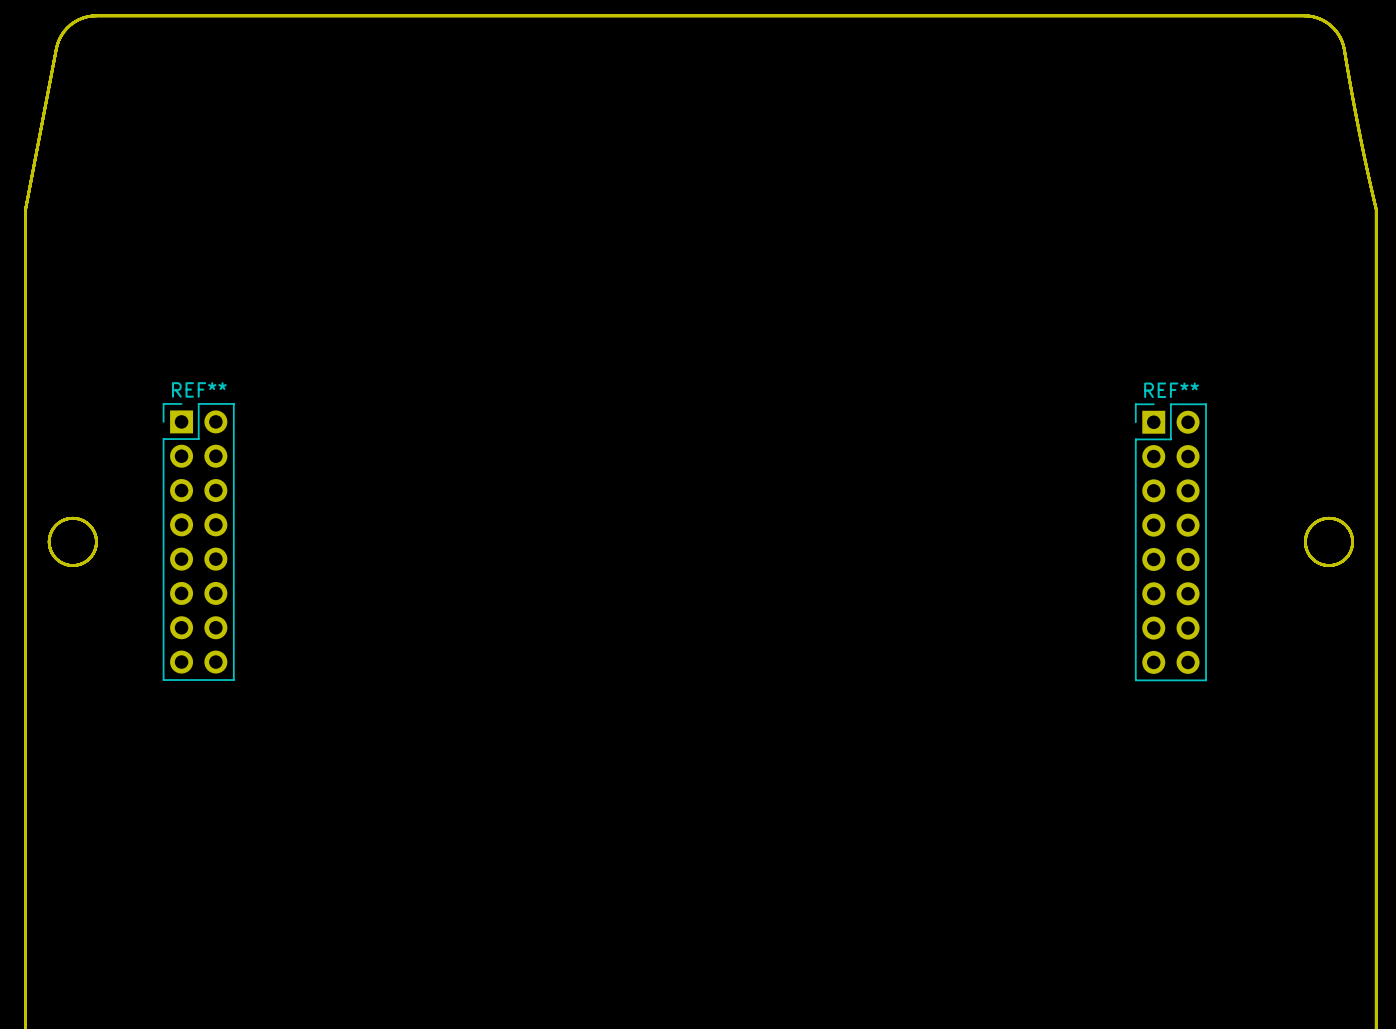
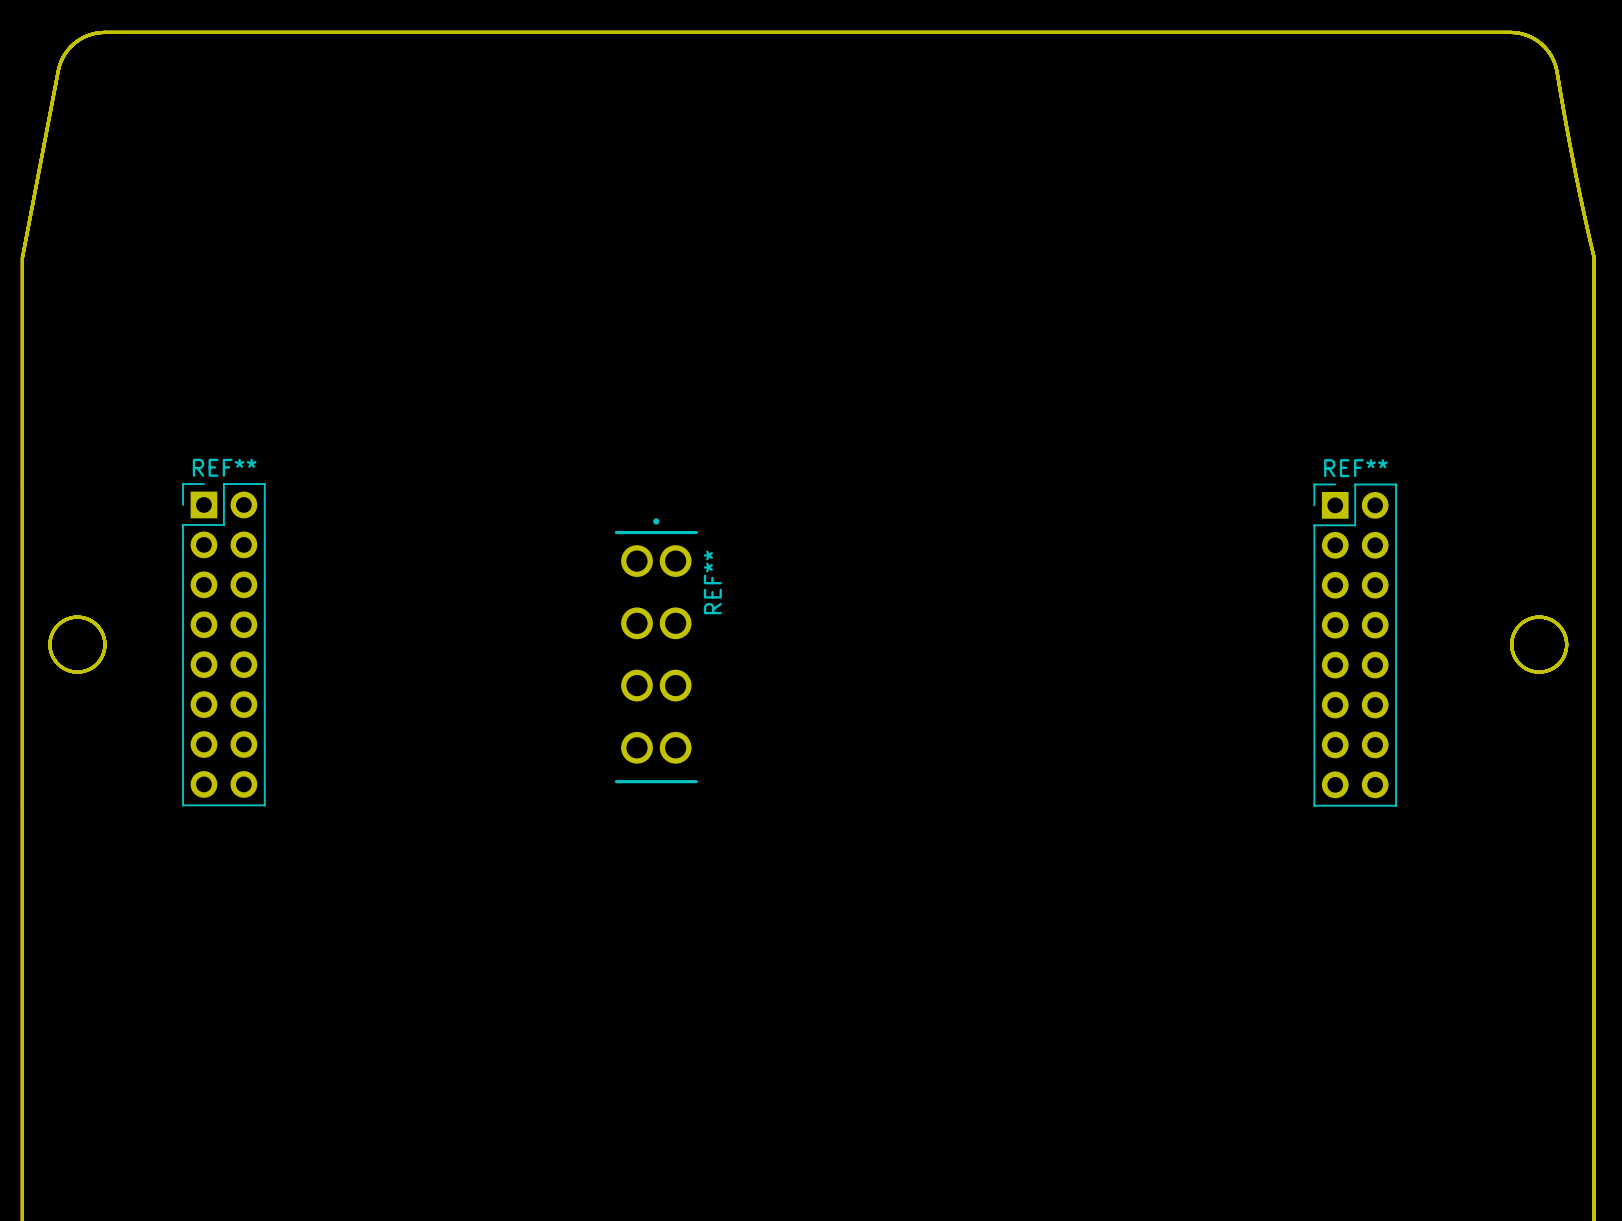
REF**: none -> (656, 650)

